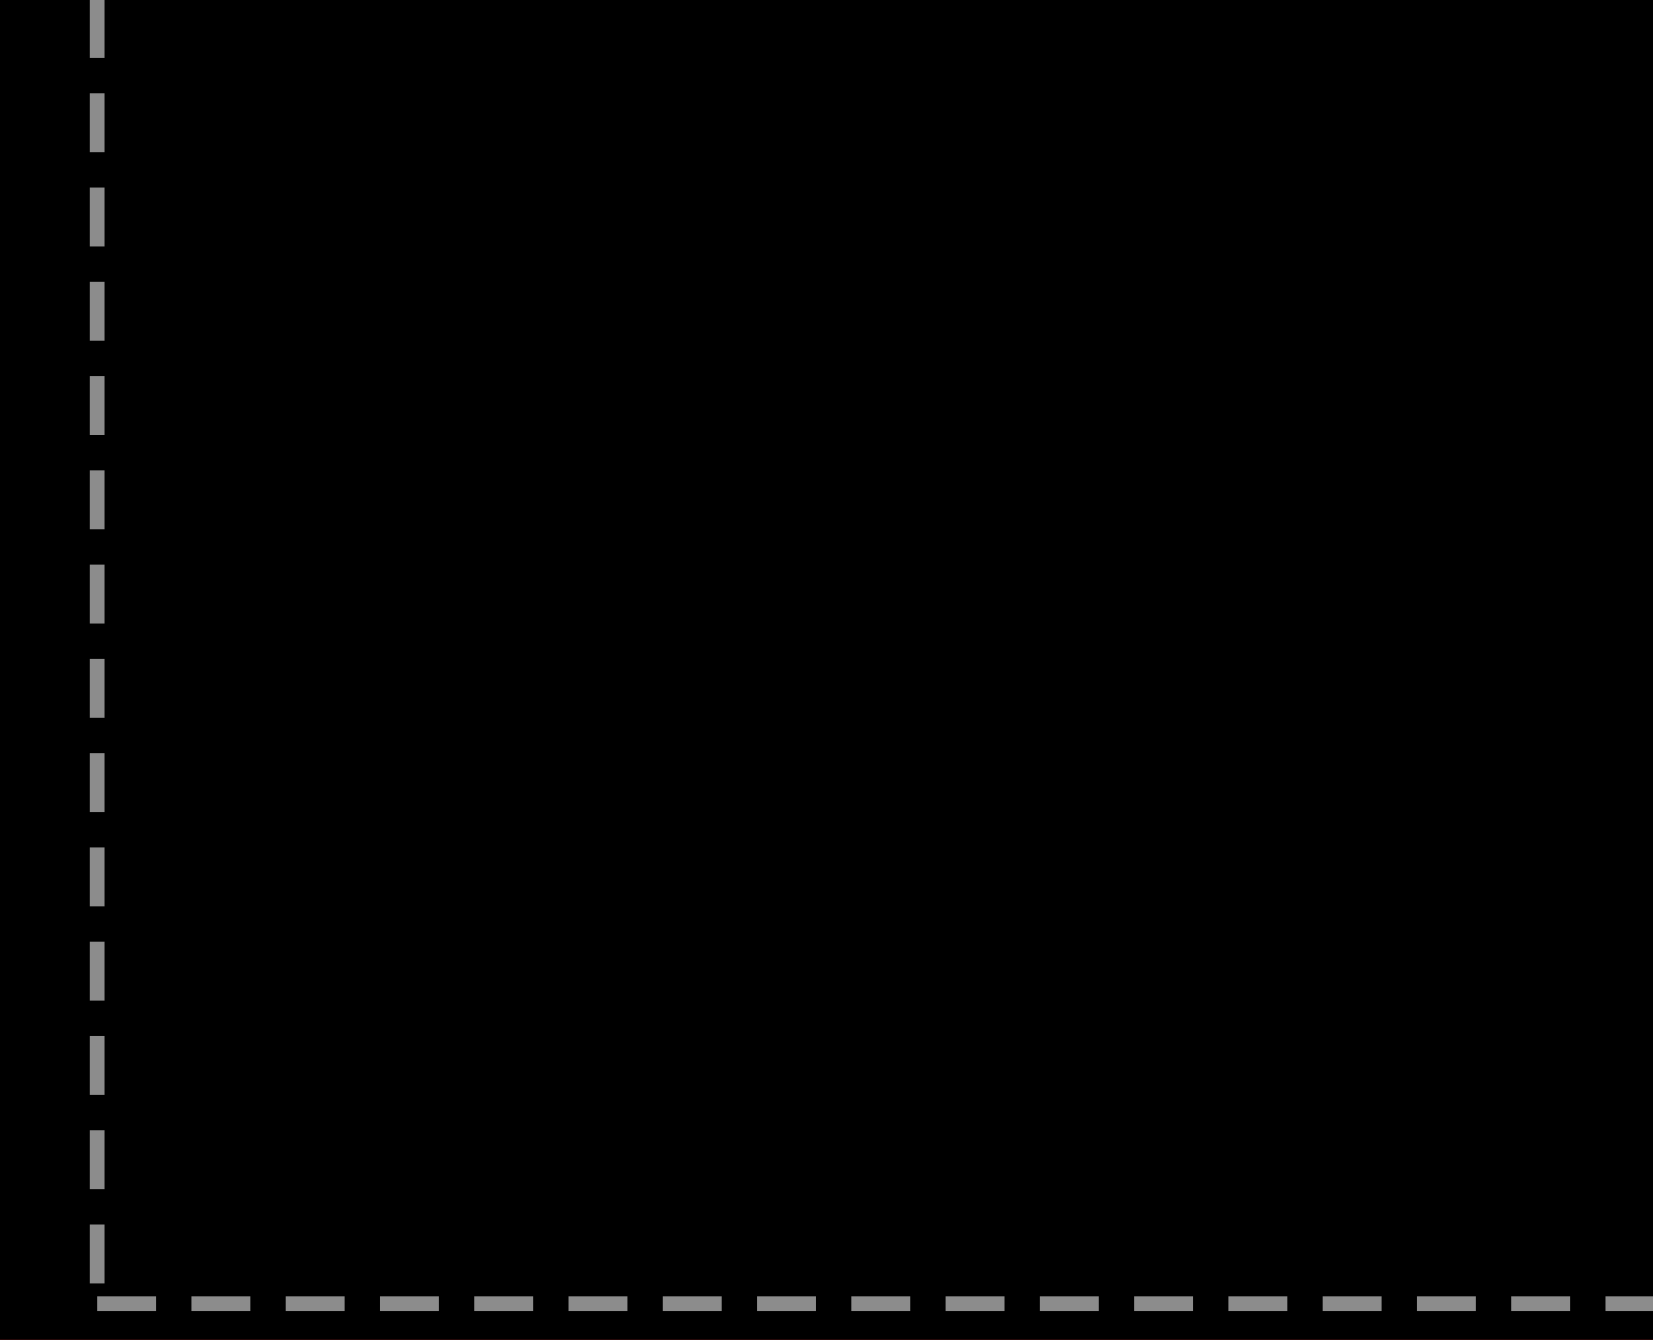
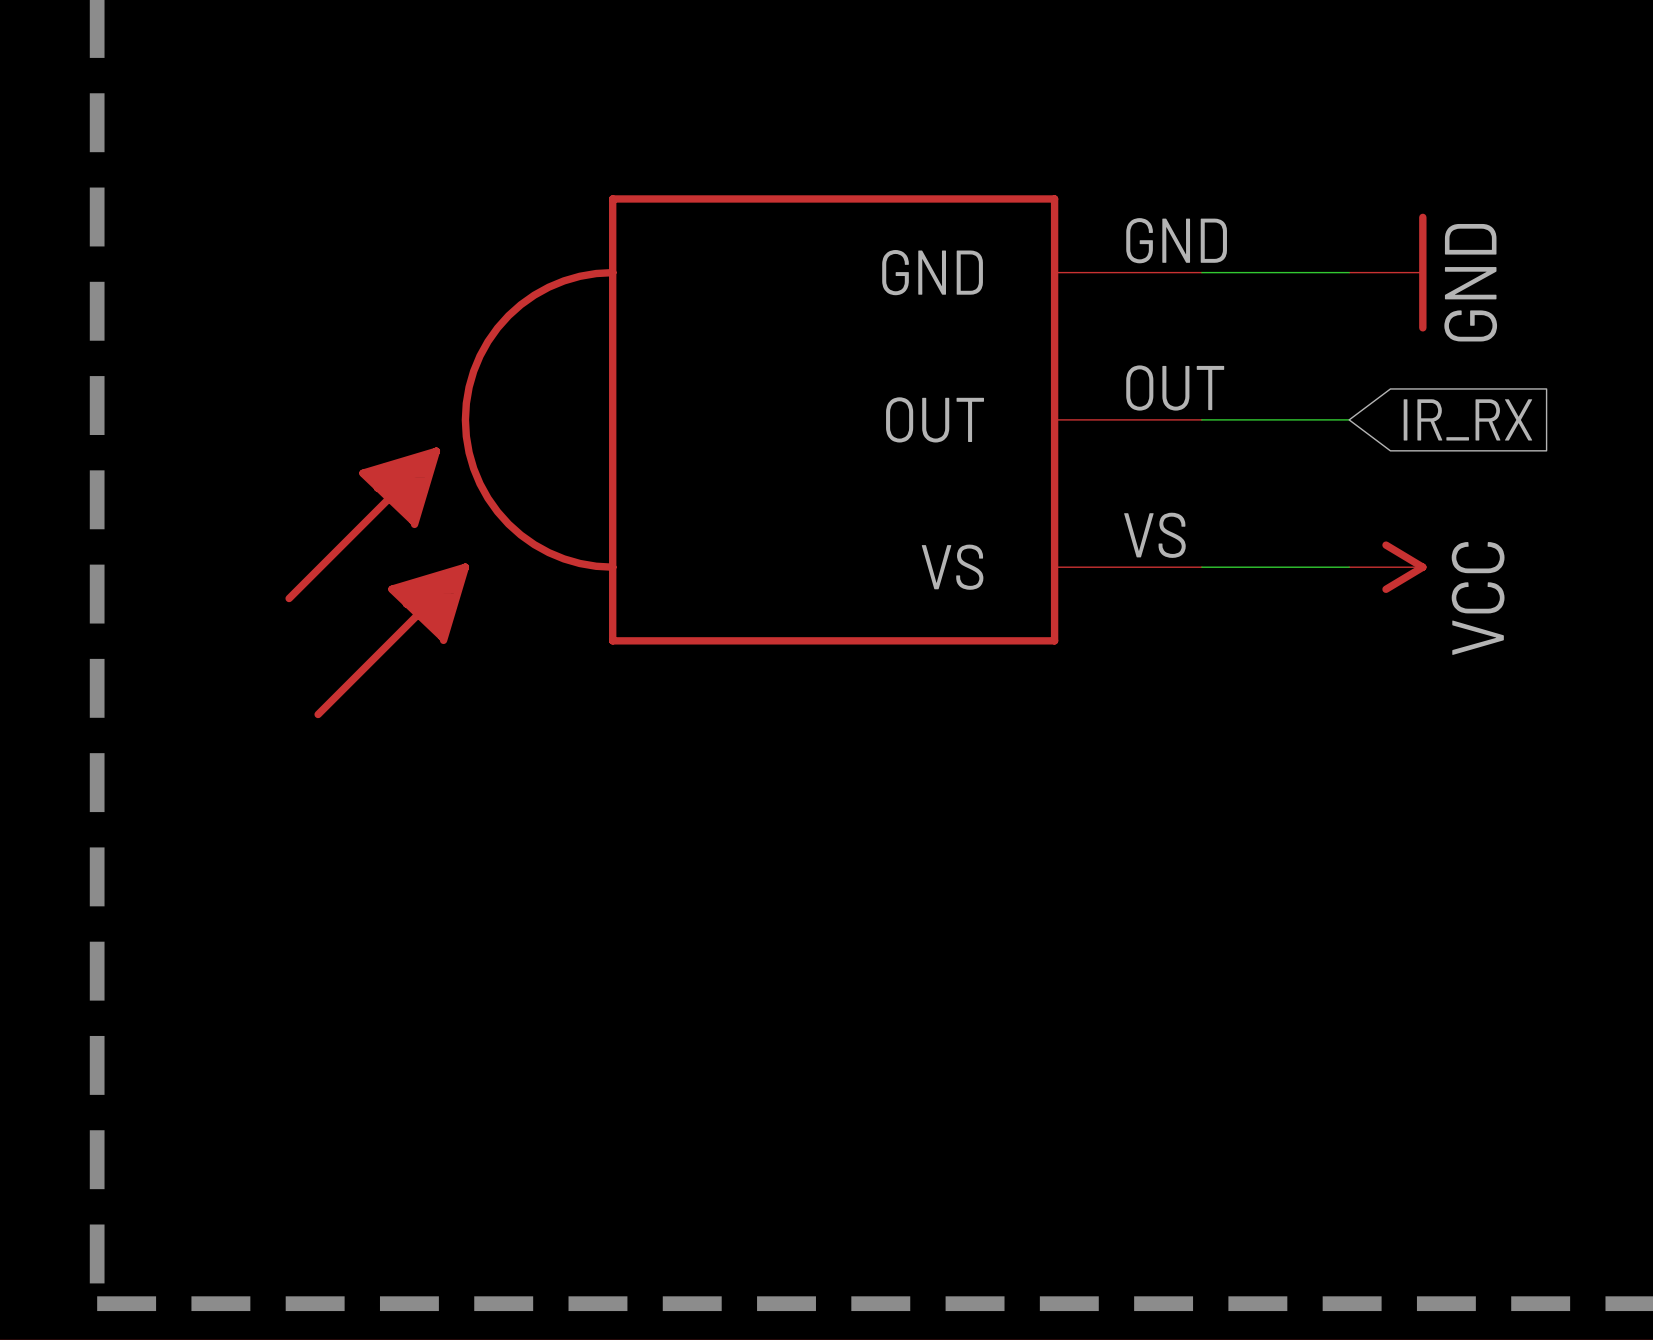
wire: none -> (1201, 272) (1349, 272)
power symbol: none -> GND (1387, 272)
wire: none -> (1201, 419) (1349, 419)
global label: none -> IR_RX (1467, 419)
part: none -> (743, 456)
wire: none -> (1201, 567) (1349, 567)
power symbol: none -> VCC (1387, 567)

